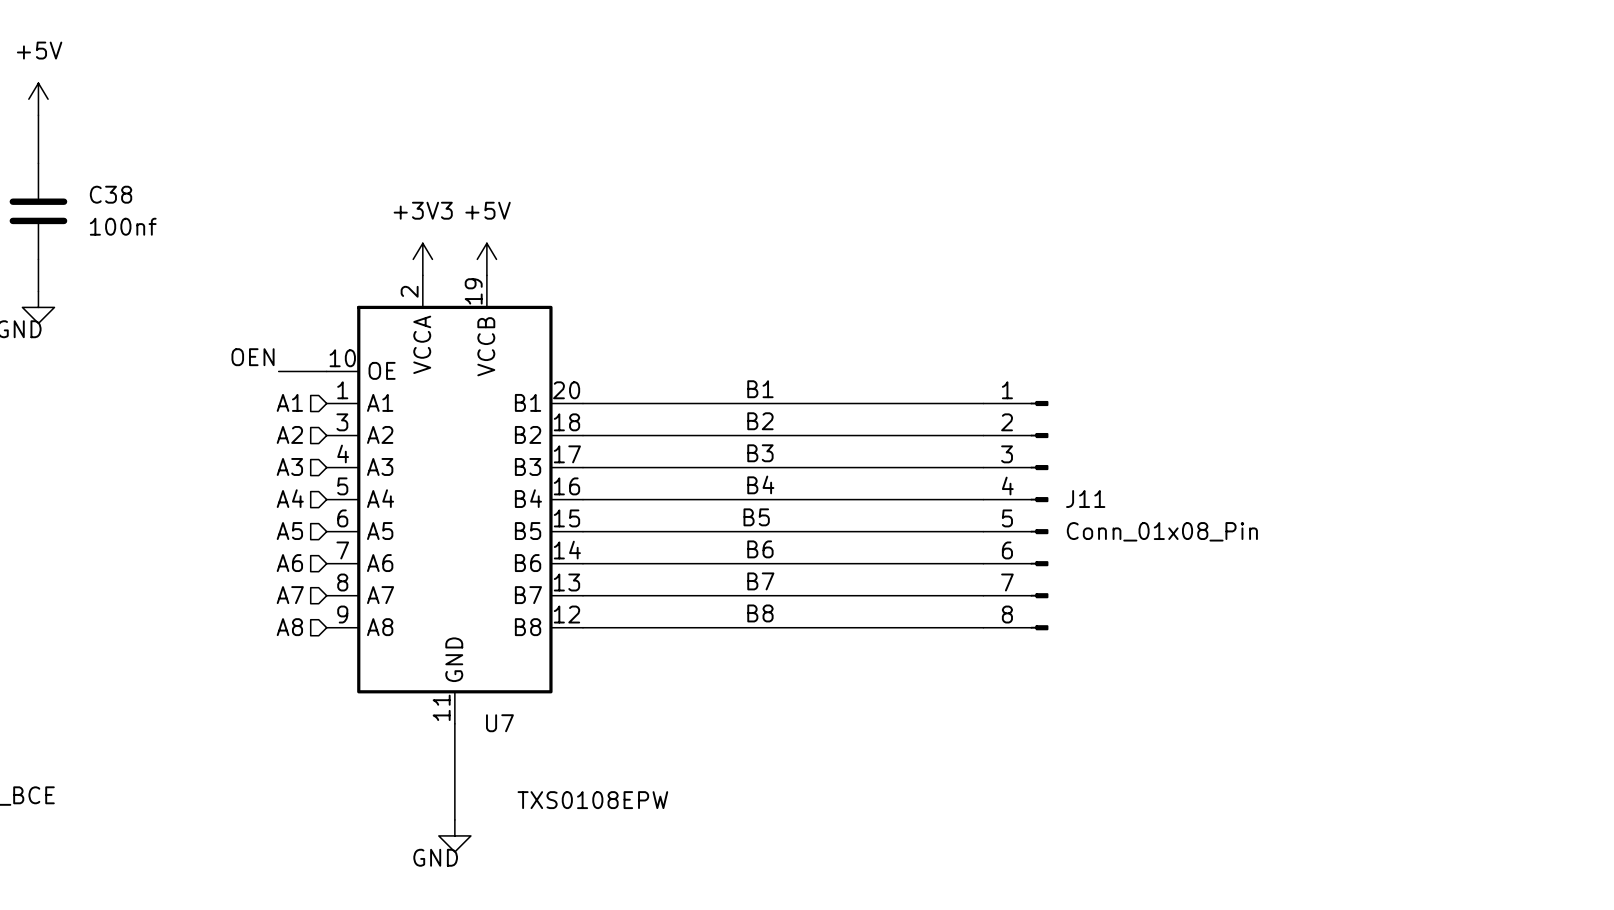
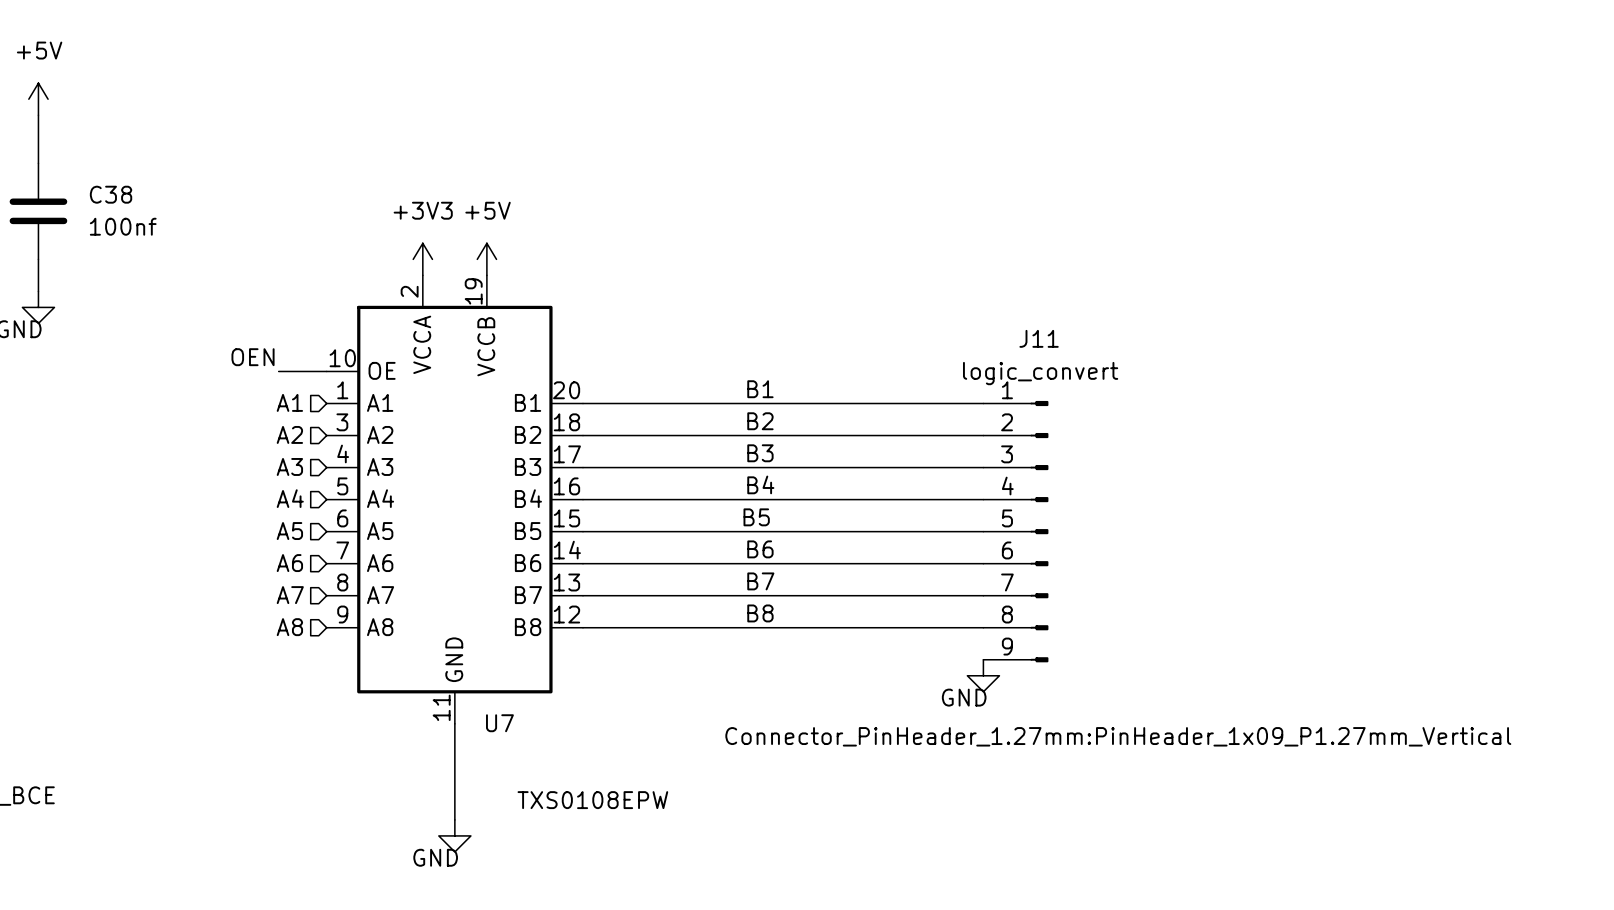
J11 symbol: [983, 400, 1049, 631] -> [983, 400, 1049, 663]
J11 name position: J11 (1085, 499) -> J11 (1039, 338)
J11 value: Conn_01x08_Pin (1162, 531) -> logic_convert (1040, 373)
power symbol: none -> GND (983, 675)
J11 text: none -> Connector_PinHeader_1.27mm:PinHeader_1x09_P1.27mm_Vertical (1118, 736)

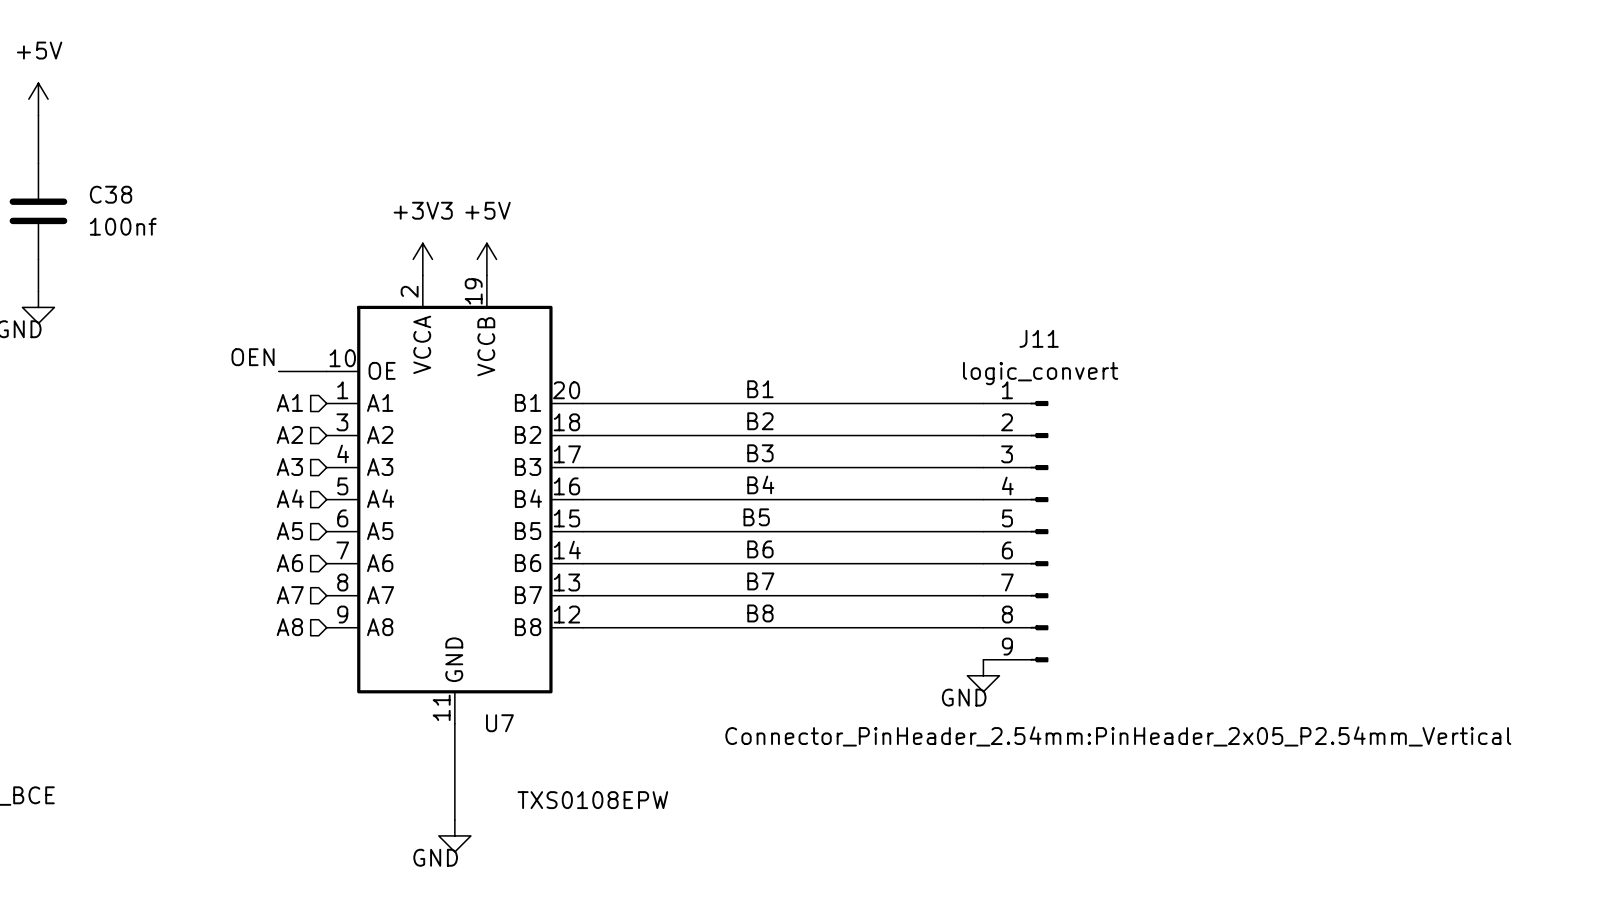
J11 text: Connector_PinHeader_1.27mm:PinHeader_1x09_P1.27mm_Vertical (1118, 736) -> Connector_PinHeader_2.54mm:PinHeader_2x05_P2.54mm_Vertical (1118, 736)

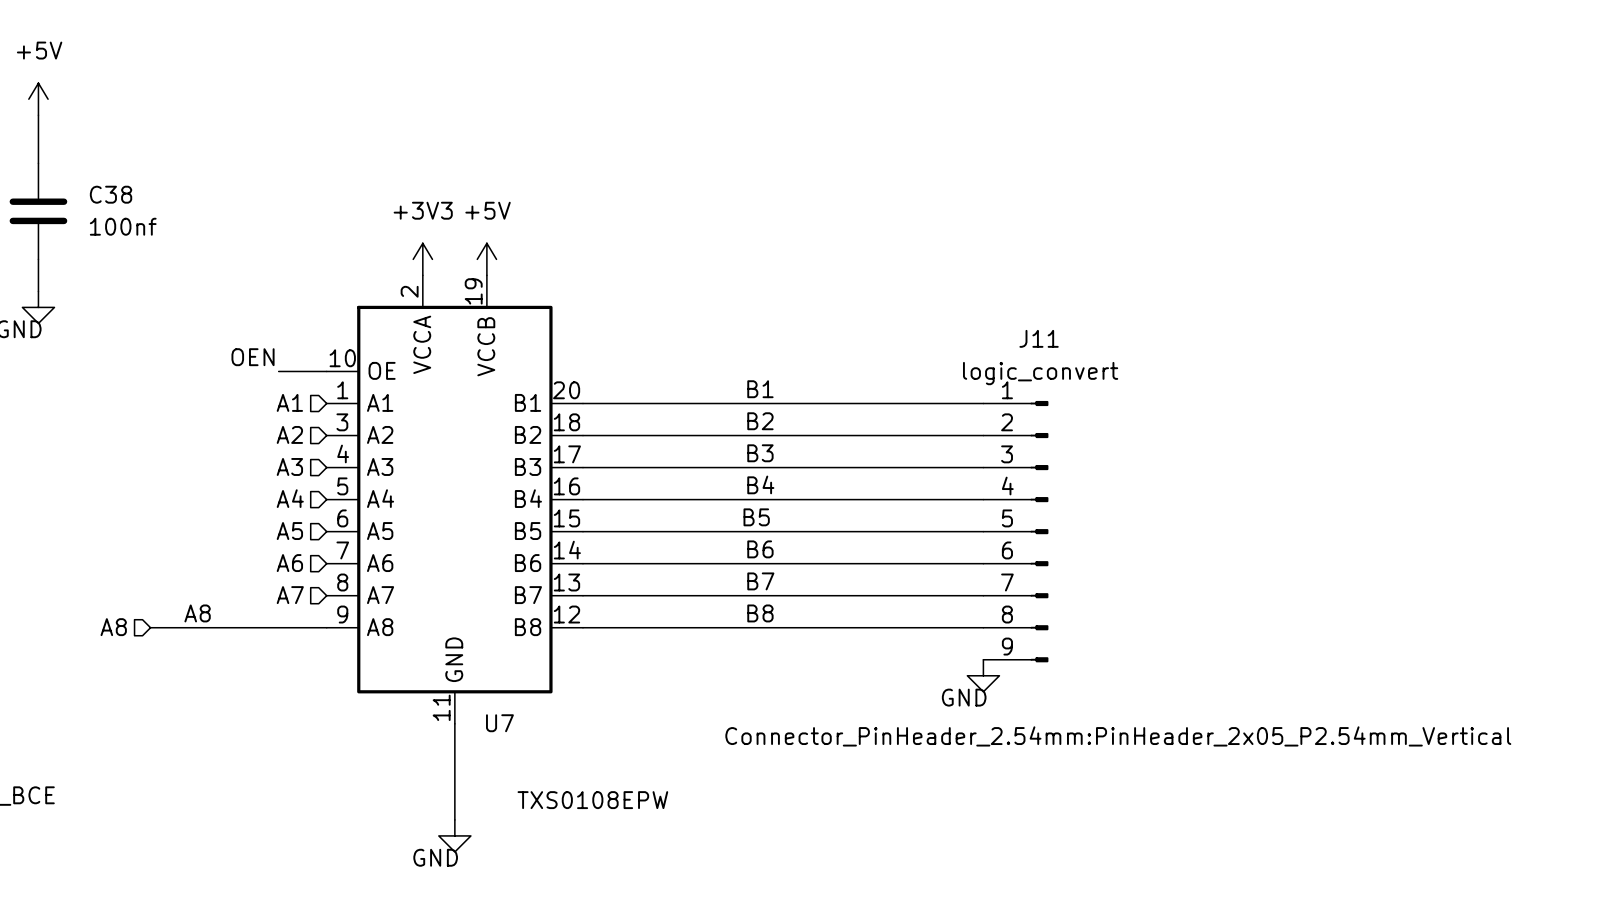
label: none -> A8 (197, 613)
wire: none -> (150, 627) (326, 627)
hierarchical label position: A8 (289, 627) -> A8 (113, 627)

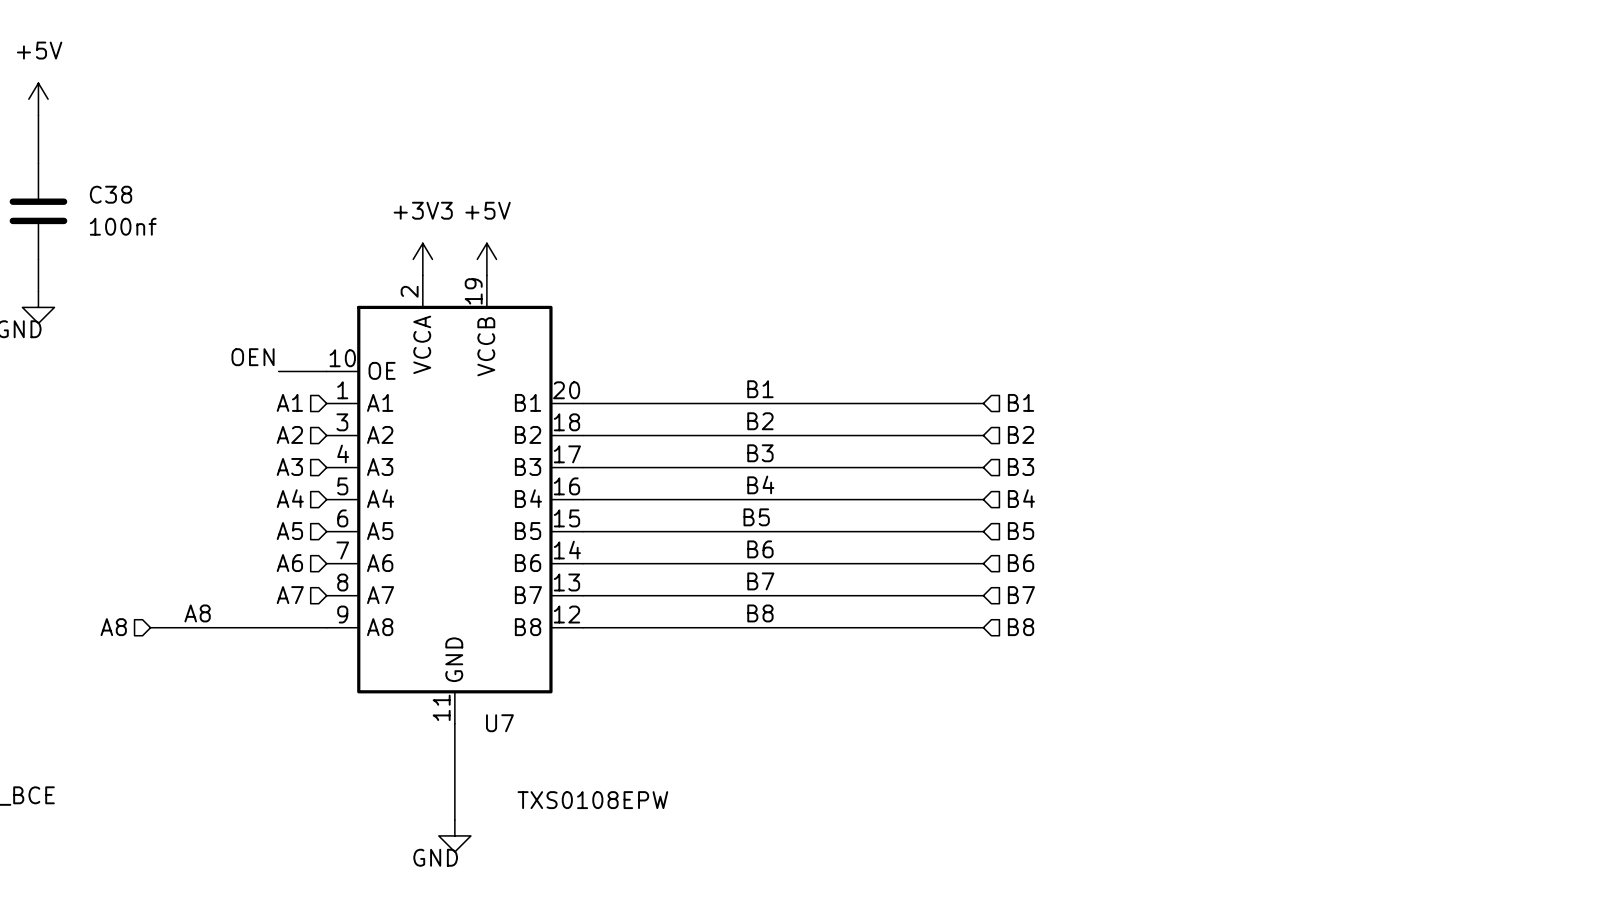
hierarchical label: none -> B1 (1021, 402)
hierarchical label: none -> B2 (1021, 434)
hierarchical label: none -> B3 (1021, 466)
hierarchical label: none -> B4 (1021, 498)
J11: logic_convert (1015, 531) -> none
hierarchical label: none -> B5 (1021, 531)
hierarchical label: none -> B6 (1021, 563)
hierarchical label: none -> B7 (1021, 595)
hierarchical label: none -> B8 (1021, 627)
power symbol: GND (983, 675) -> none

